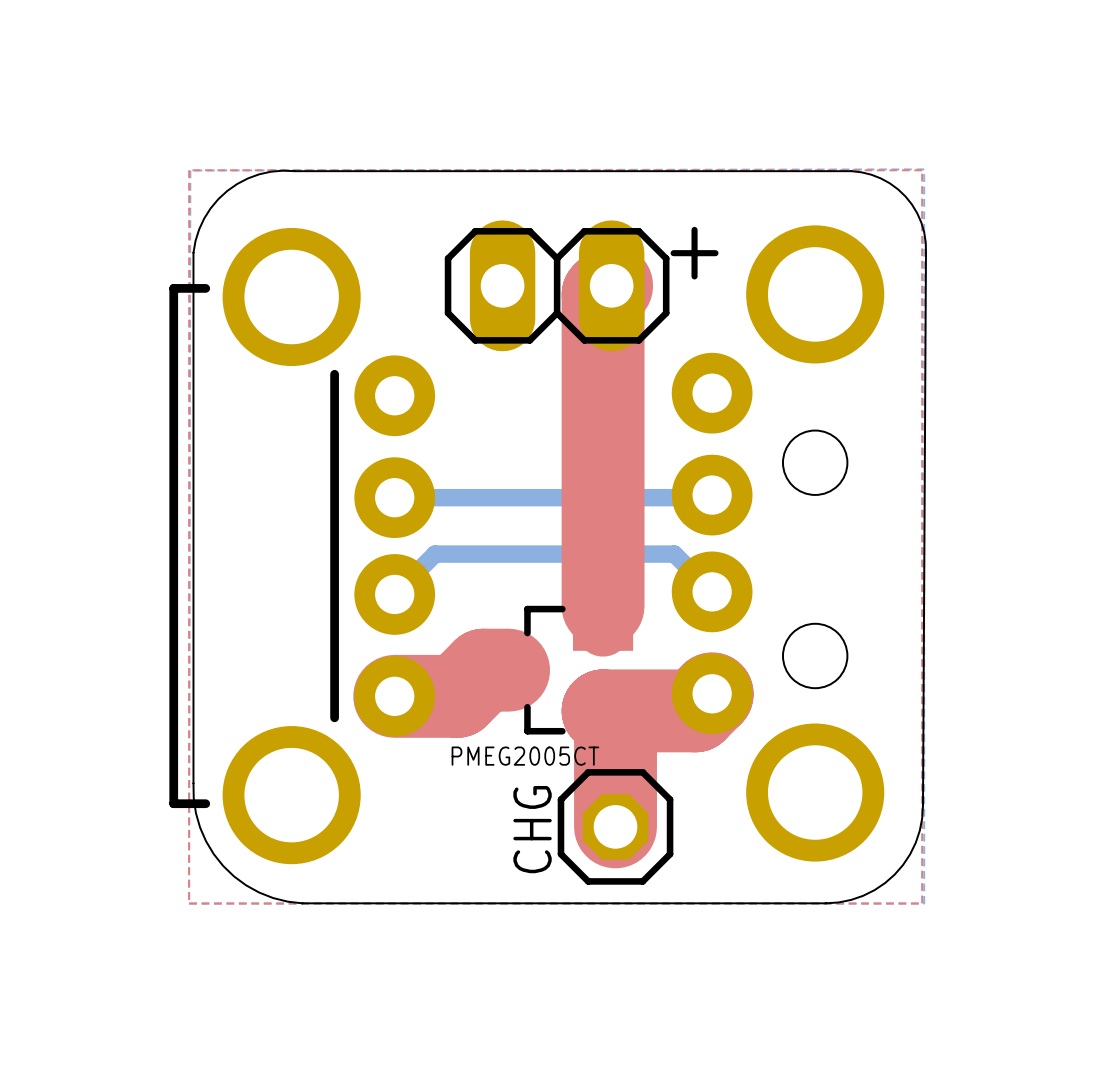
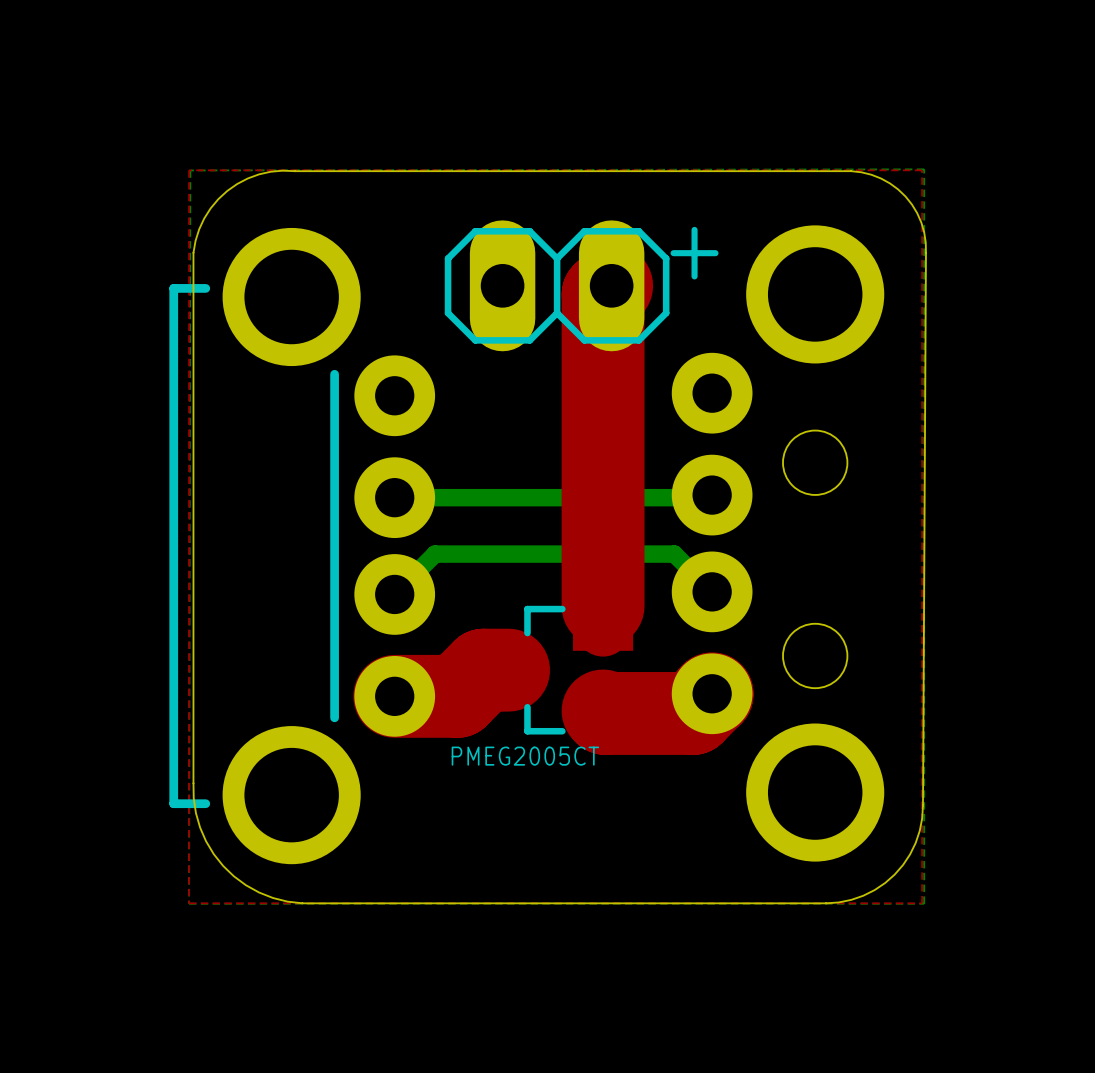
top track: (695, 710) (603, 710) (615, 723) (615, 826) -> (695, 710) (692, 713) (605, 713) (603, 710)
CHG: (615, 826) -> none

